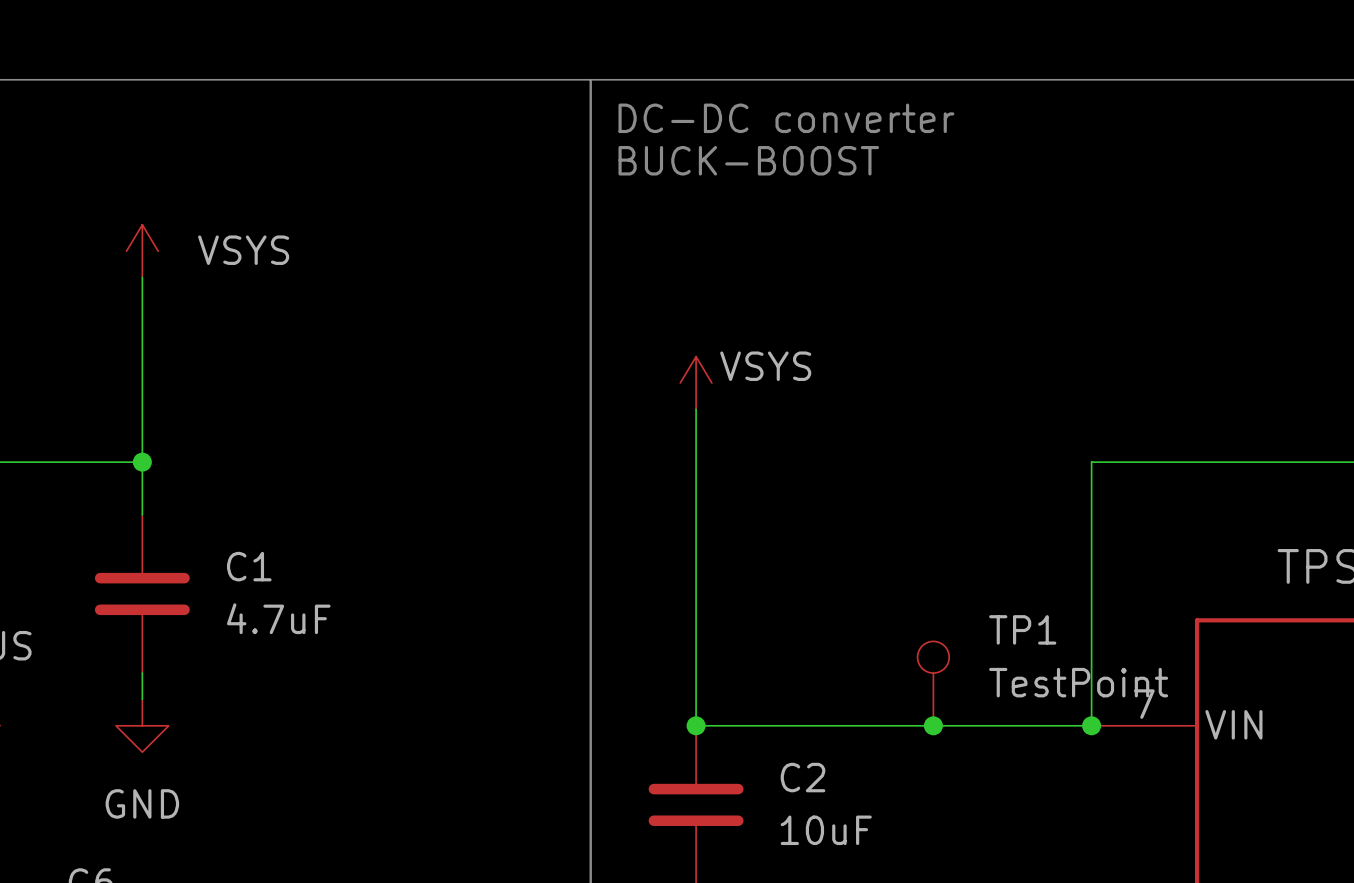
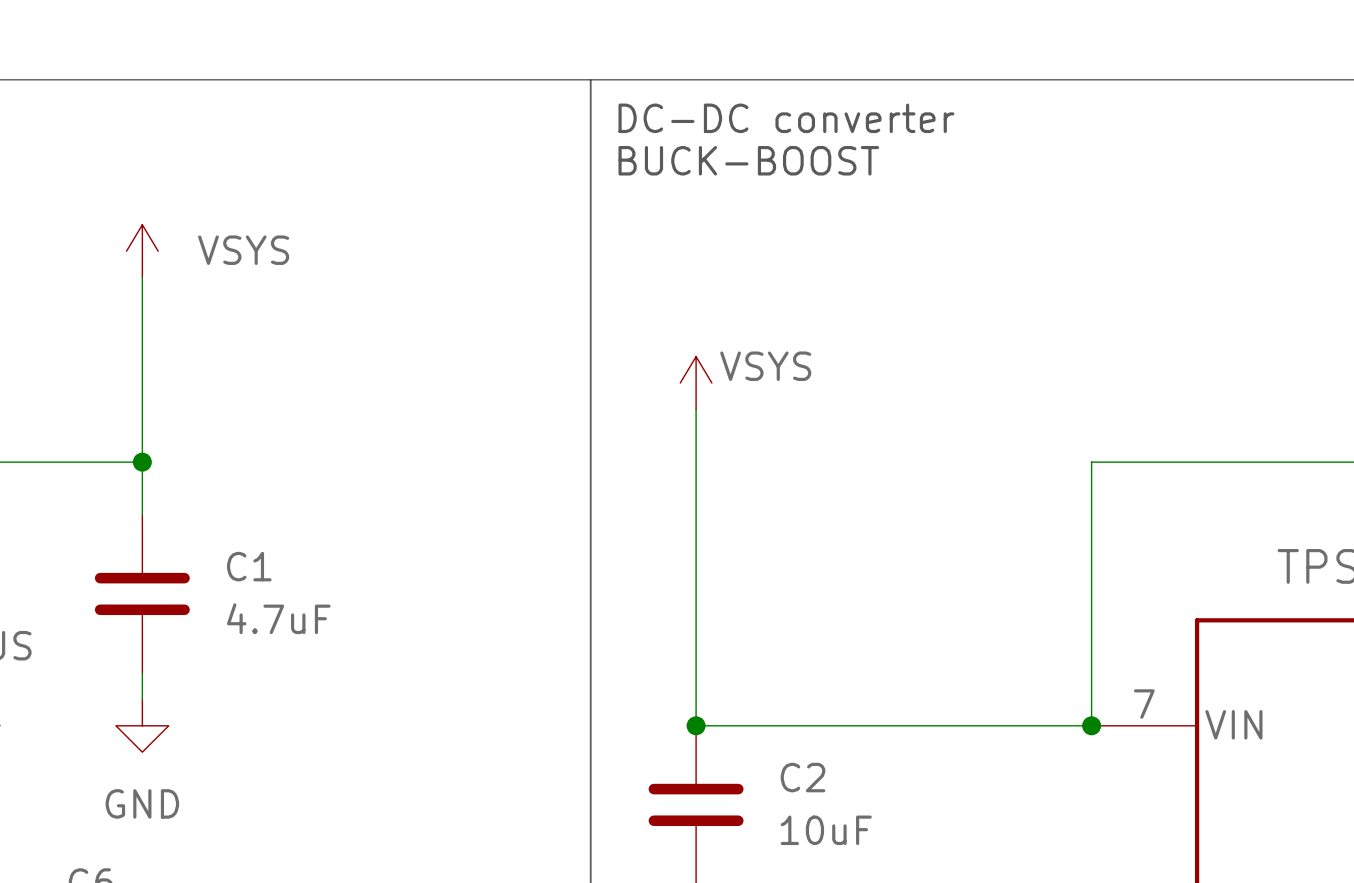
TP1: TestPoint (933, 683) -> none
junction: (933, 725) -> none

